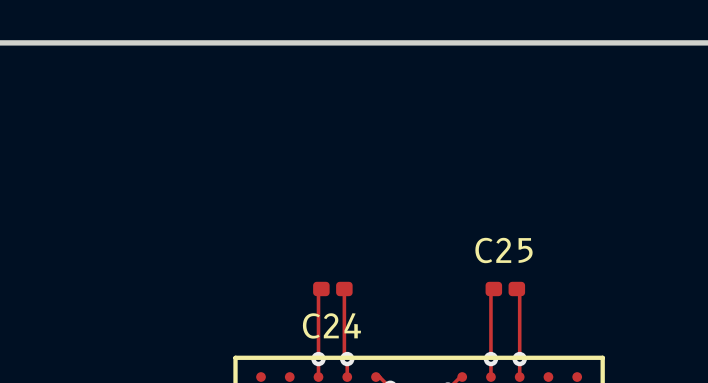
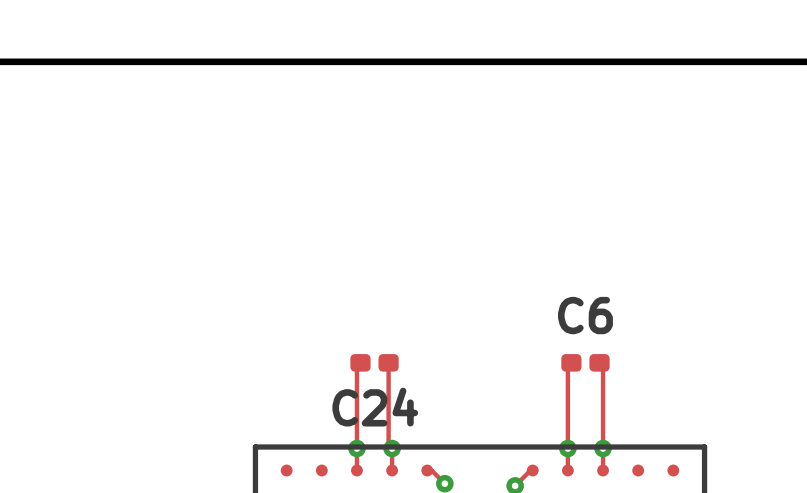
C25 name: C25 (503, 250) -> C6 (585, 315)

